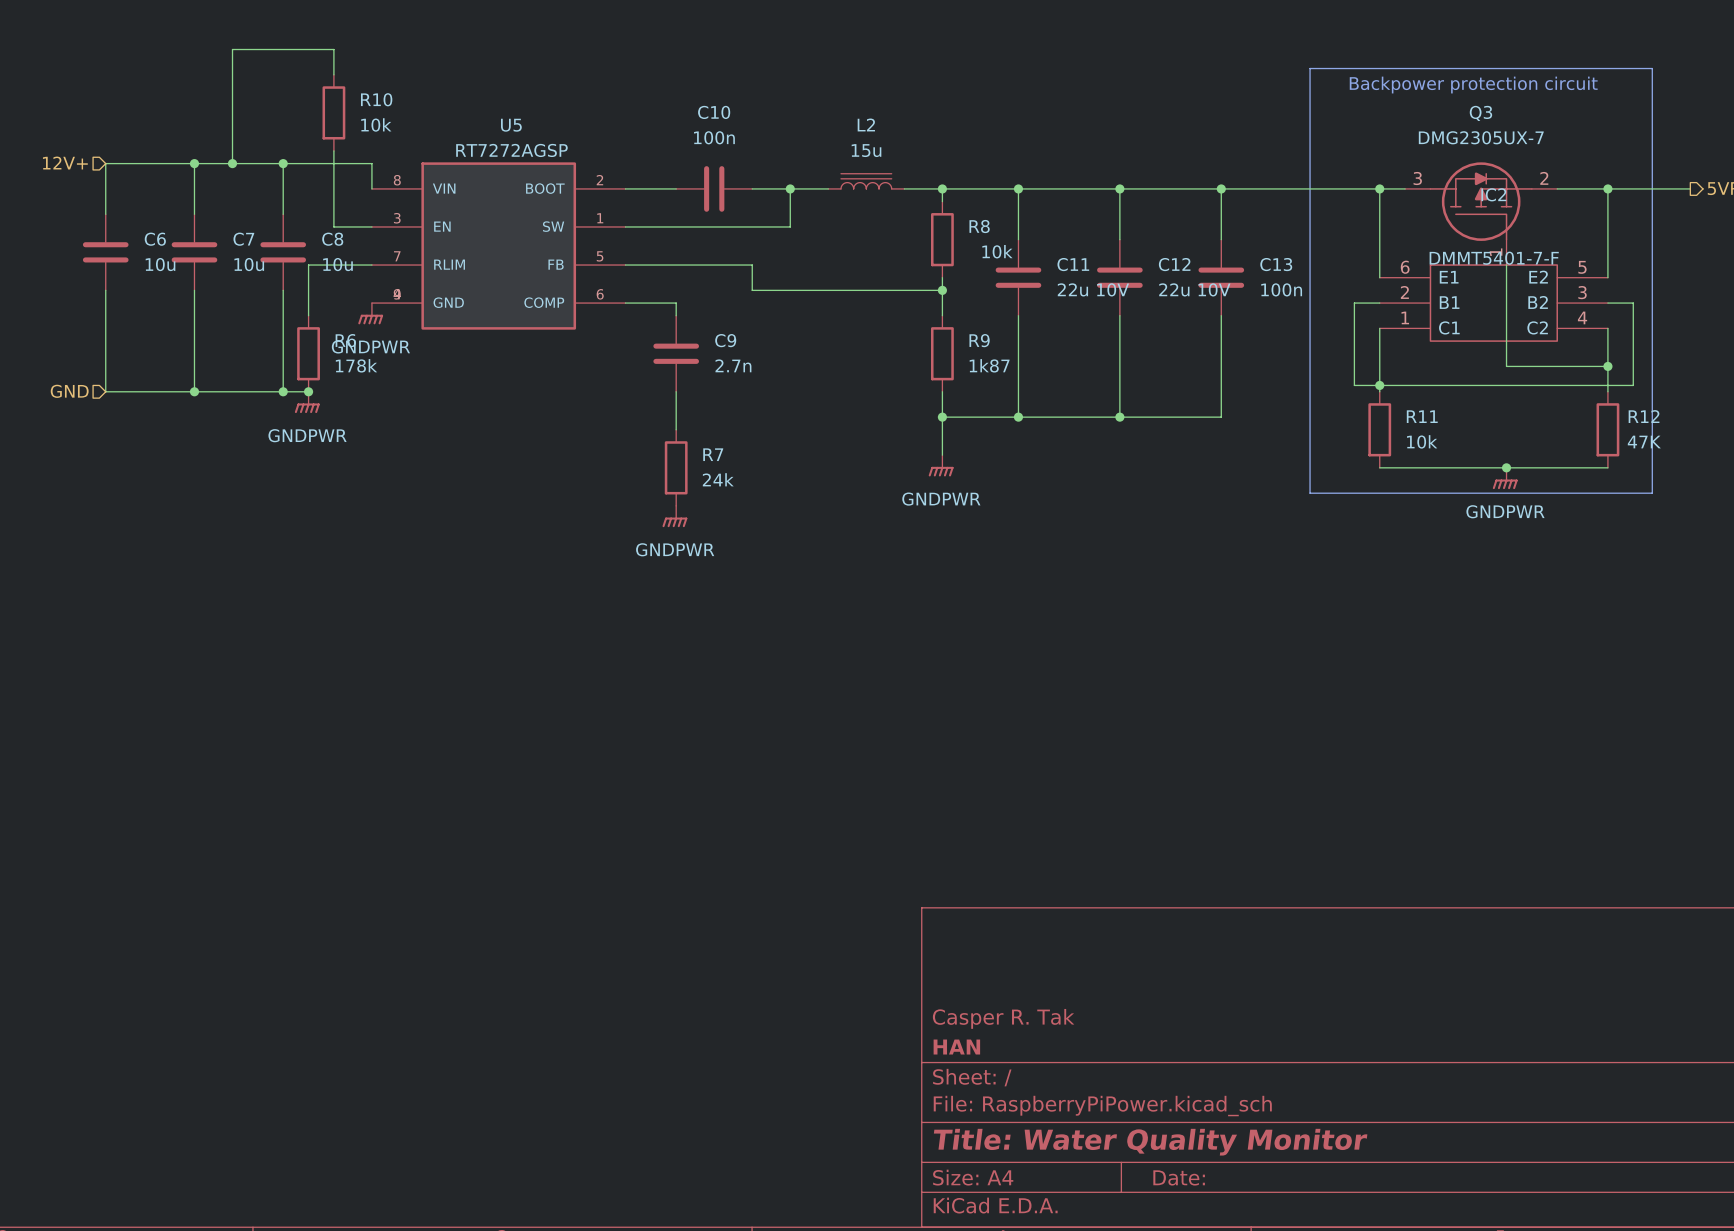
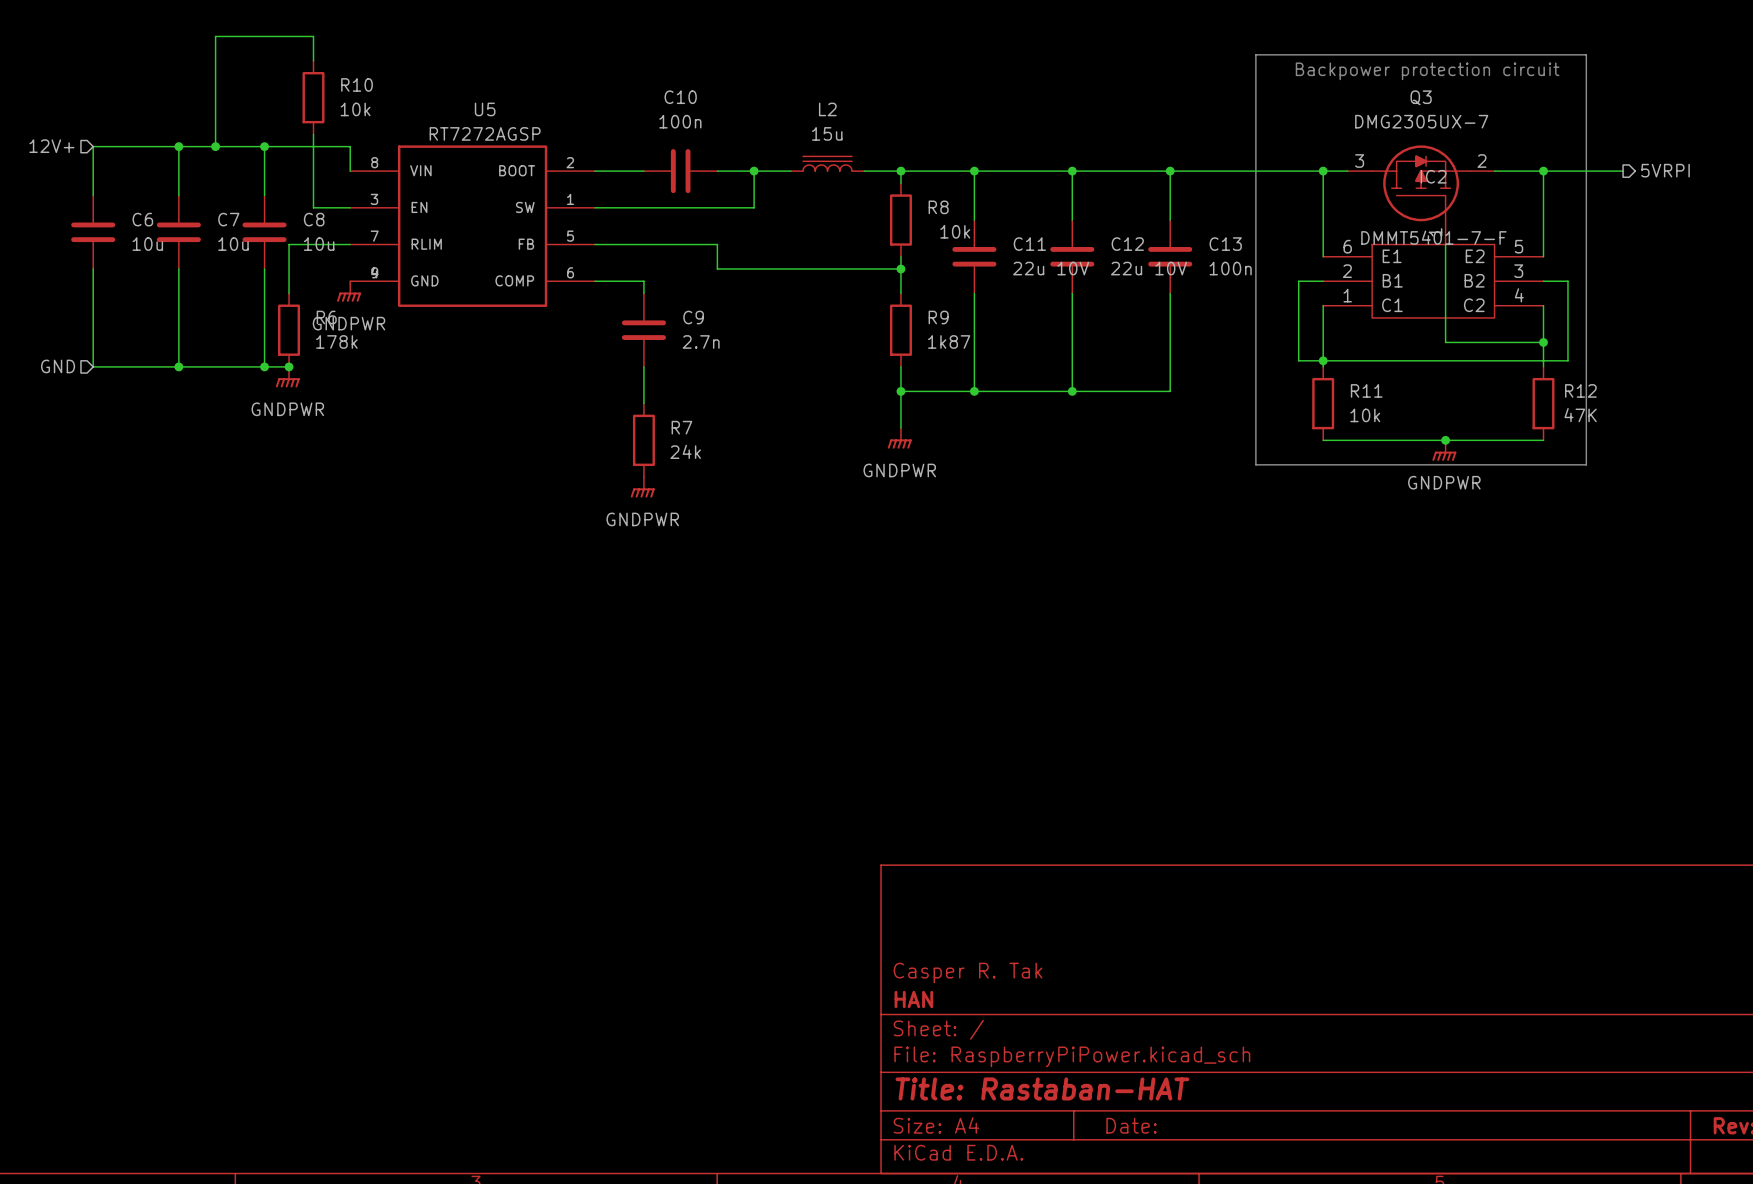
title block: Title: Water Quality Monitor (1150, 1142) -> Title: Rastaban-HAT (1042, 1088)

